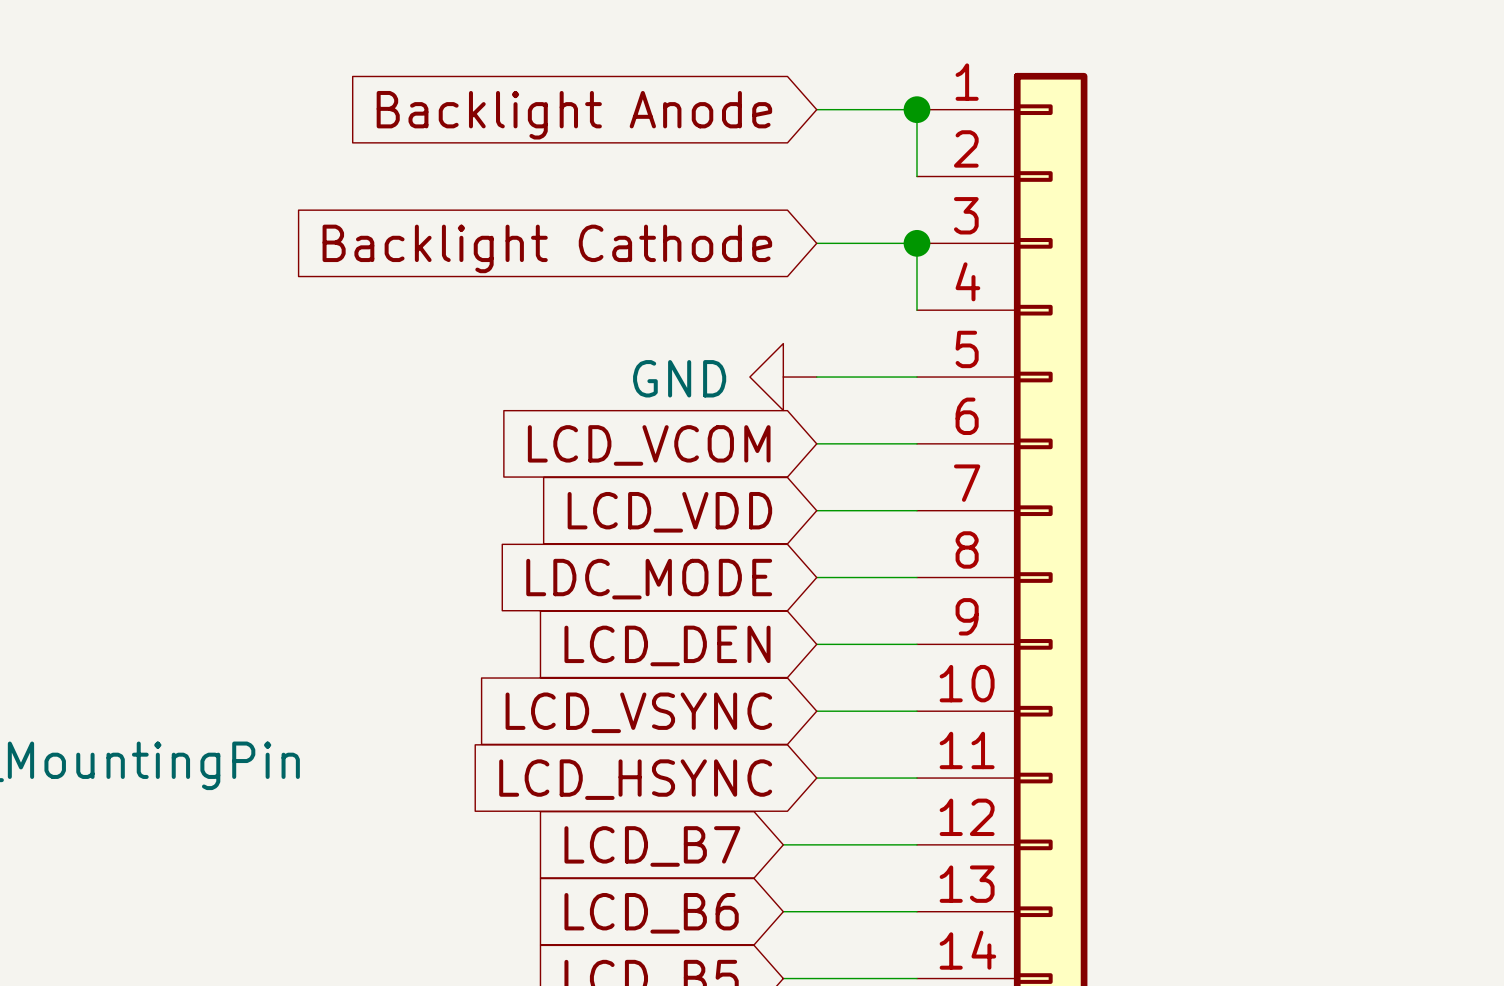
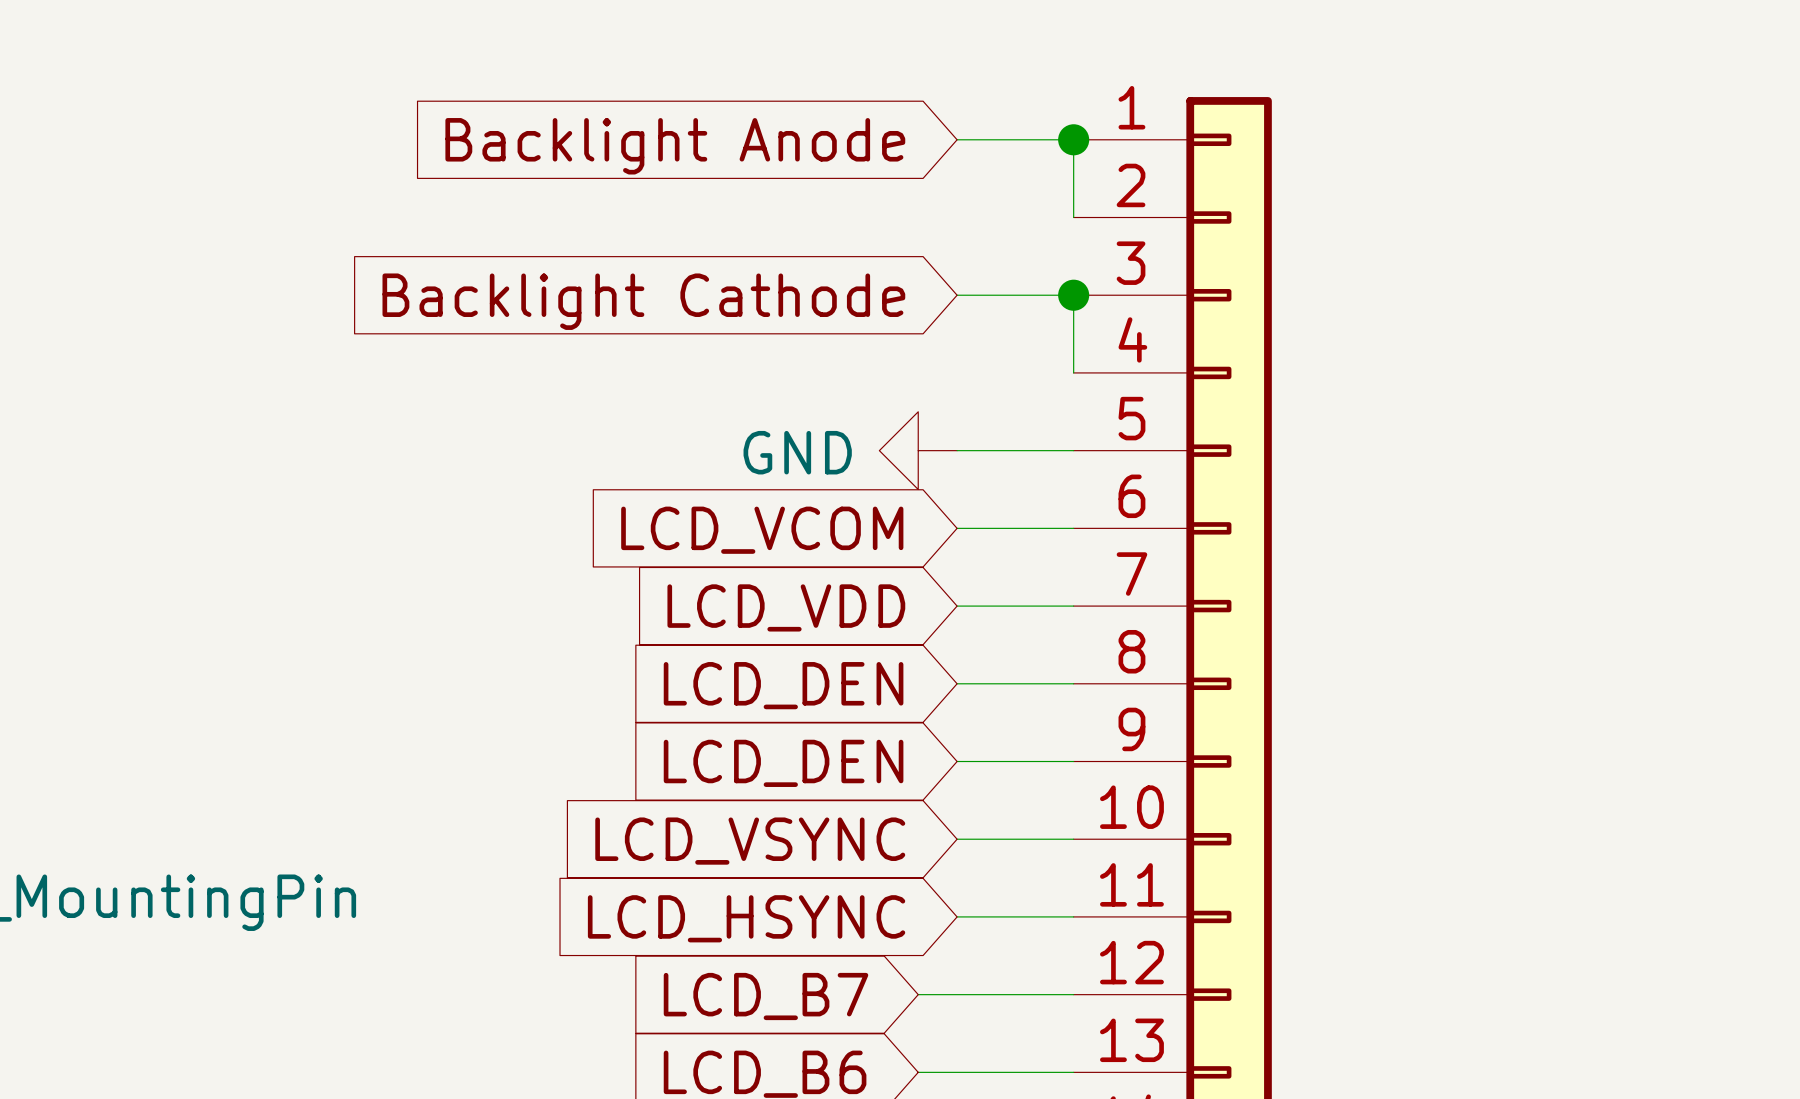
global label: LDC_MODE (649, 579) -> LCD_DEN (783, 685)

